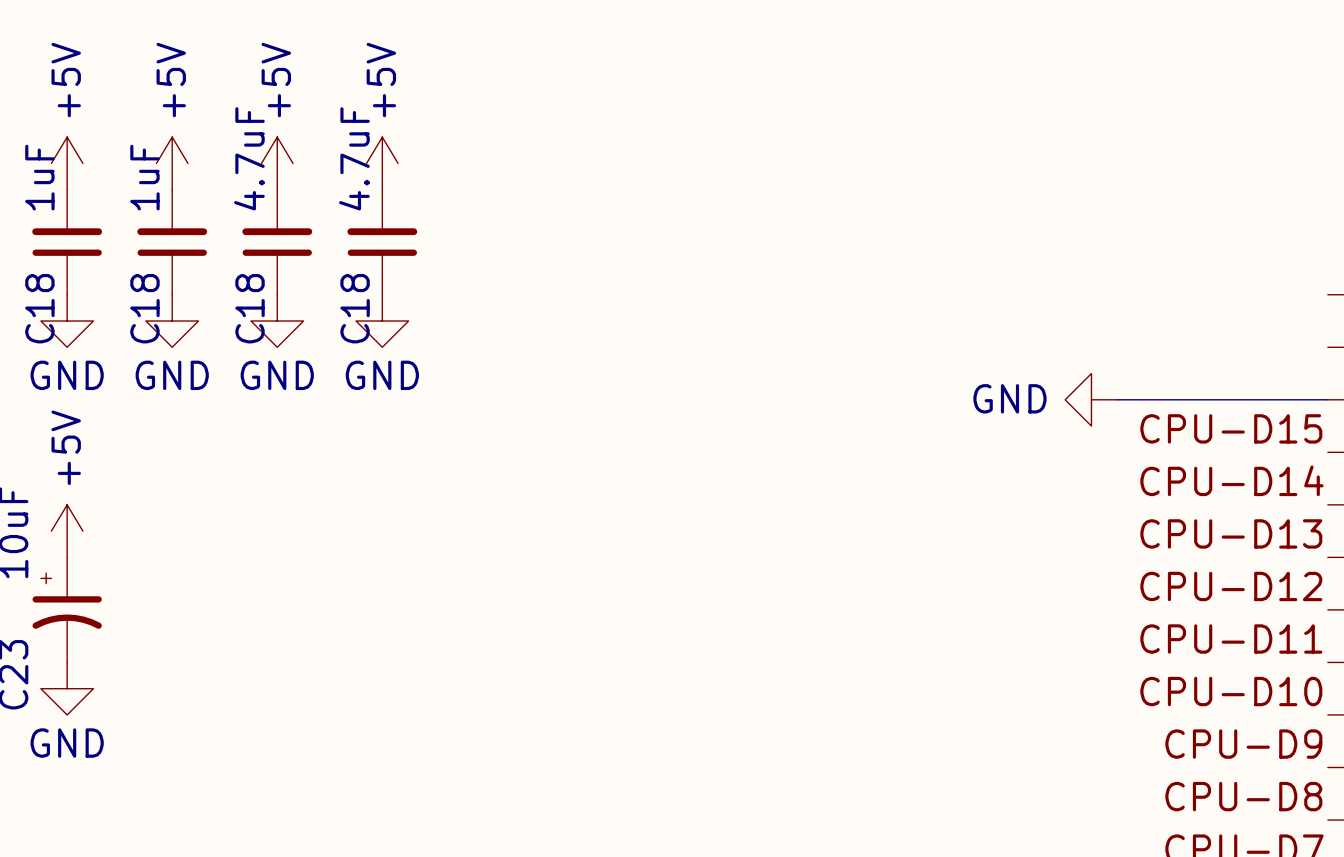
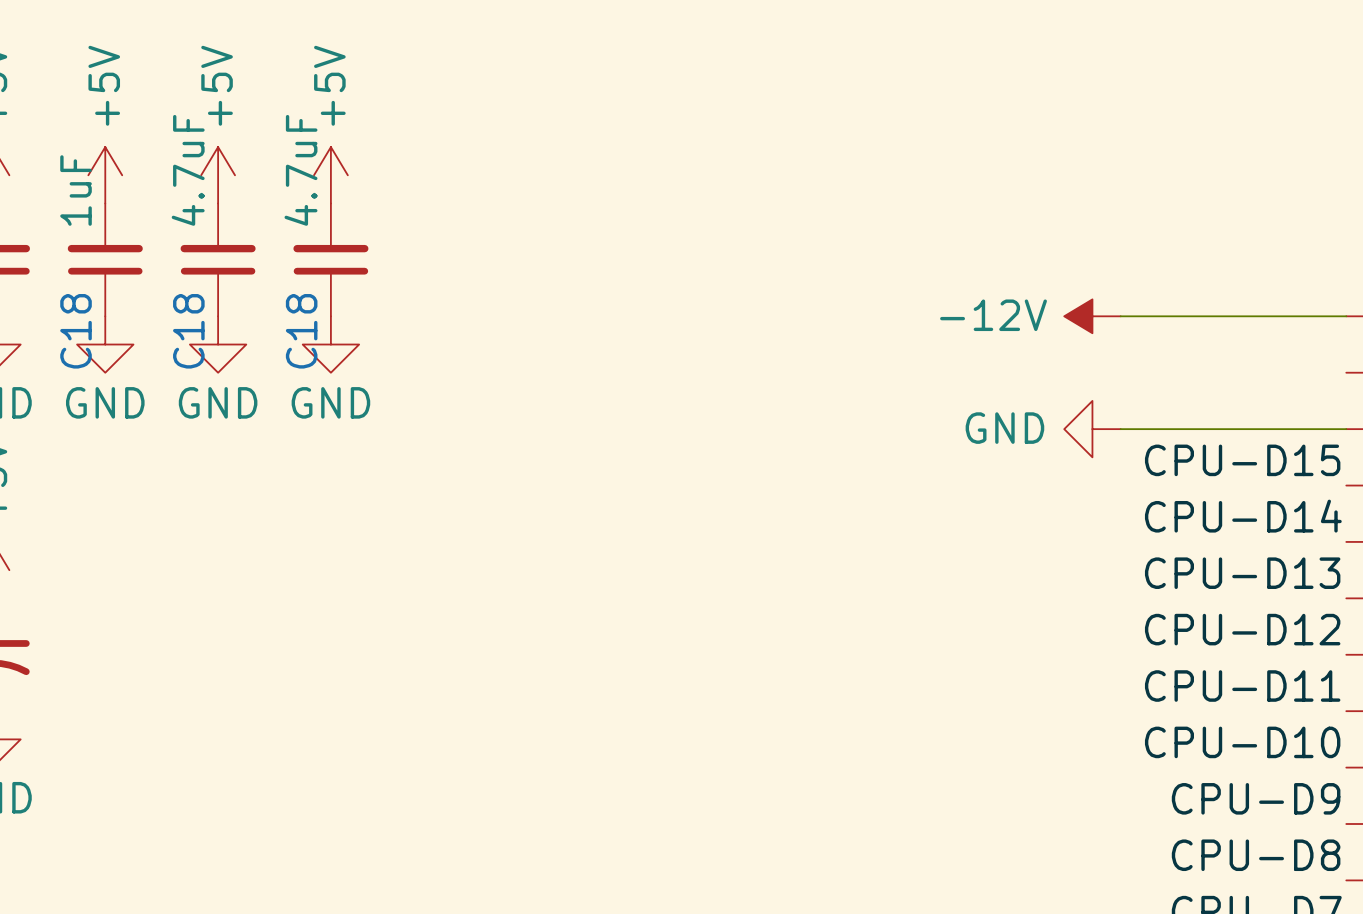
power symbol: none -> -12V (1092, 316)
wire: none -> (1120, 316) (1346, 316)

